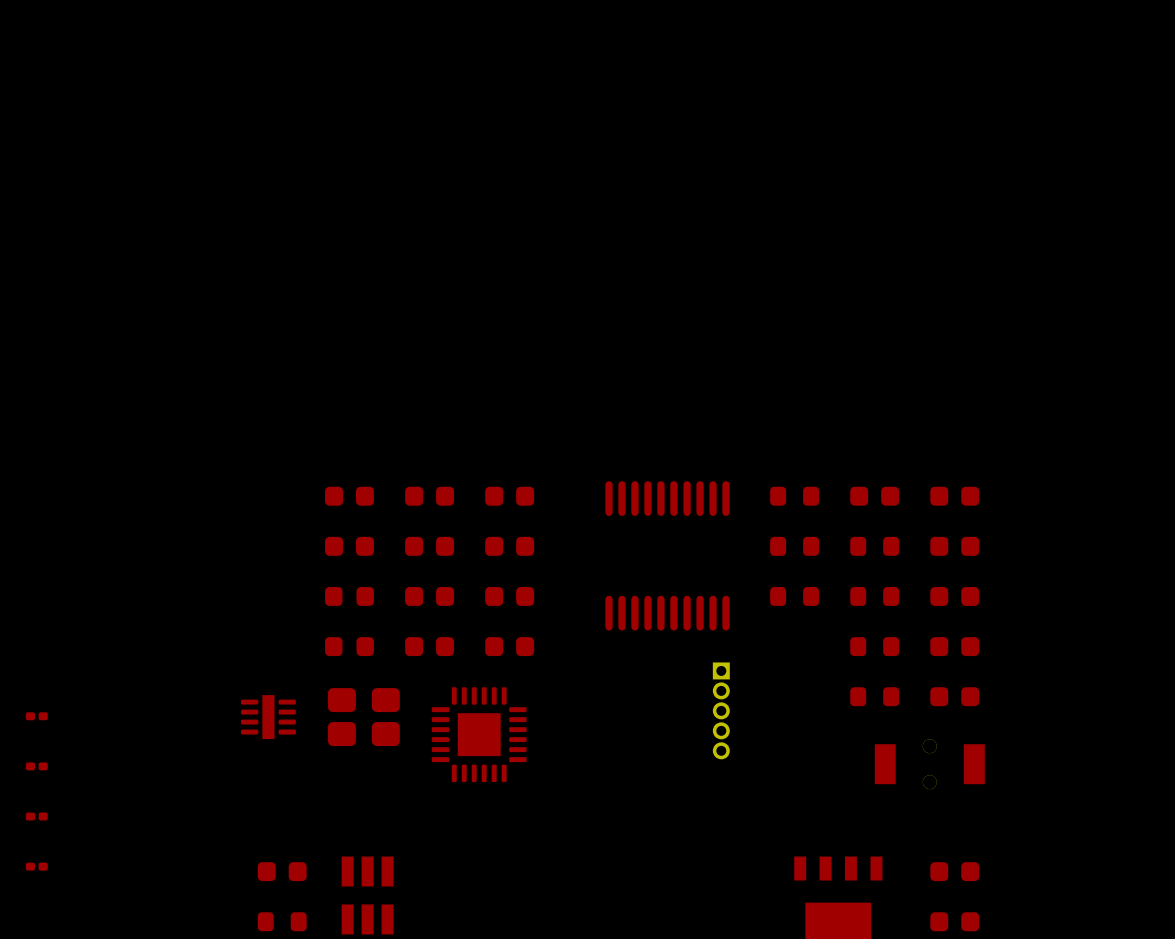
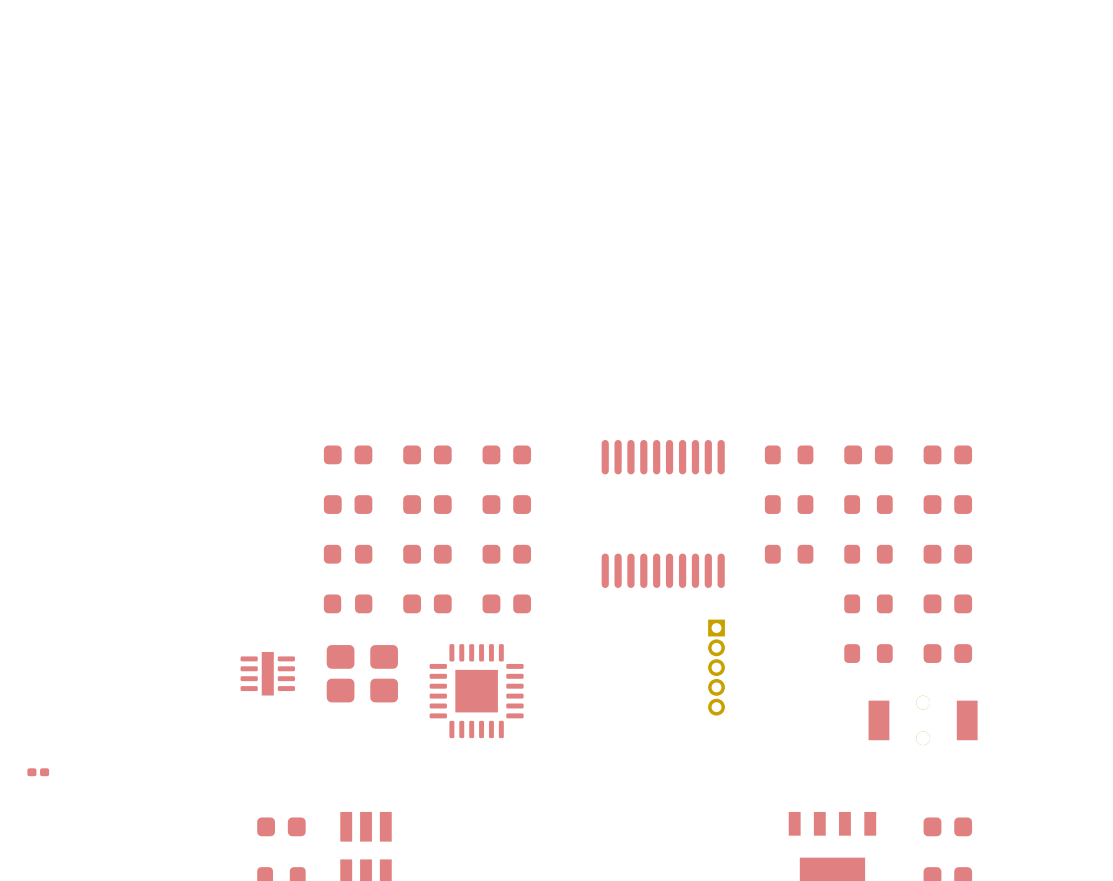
part: (36, 716) -> none
part: (36, 766) -> none
part: (36, 866) -> none

